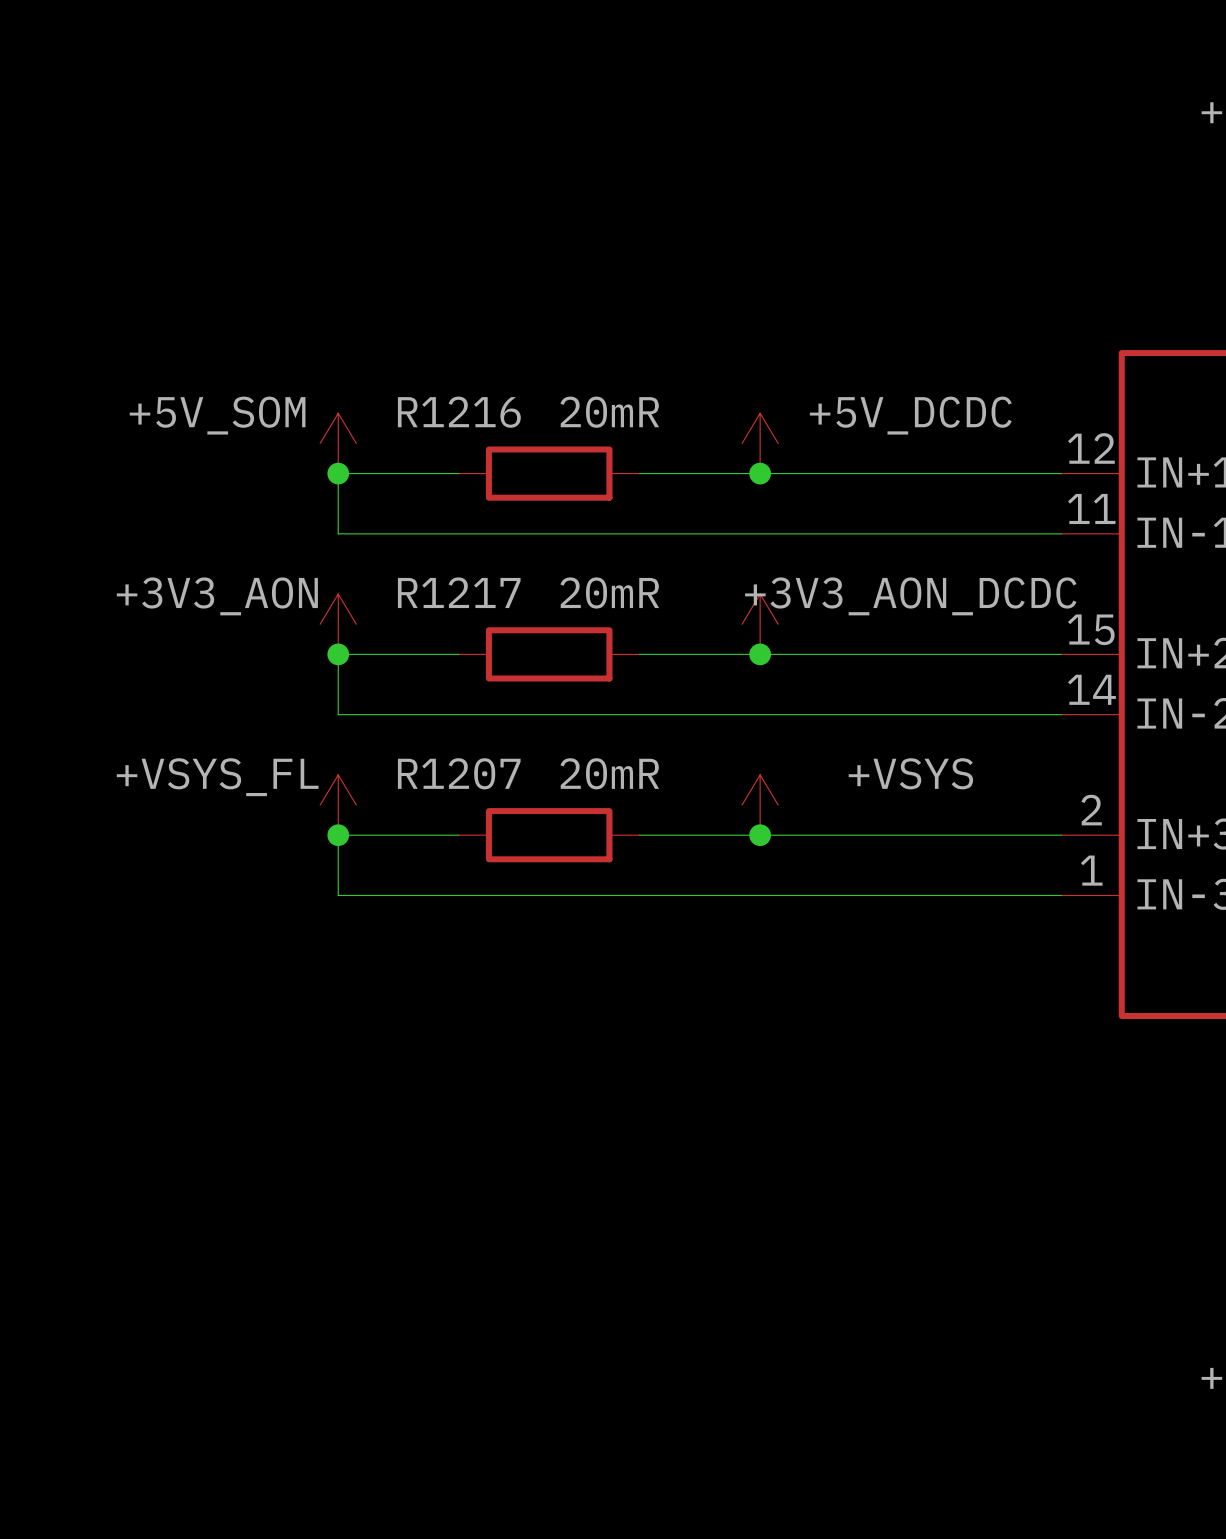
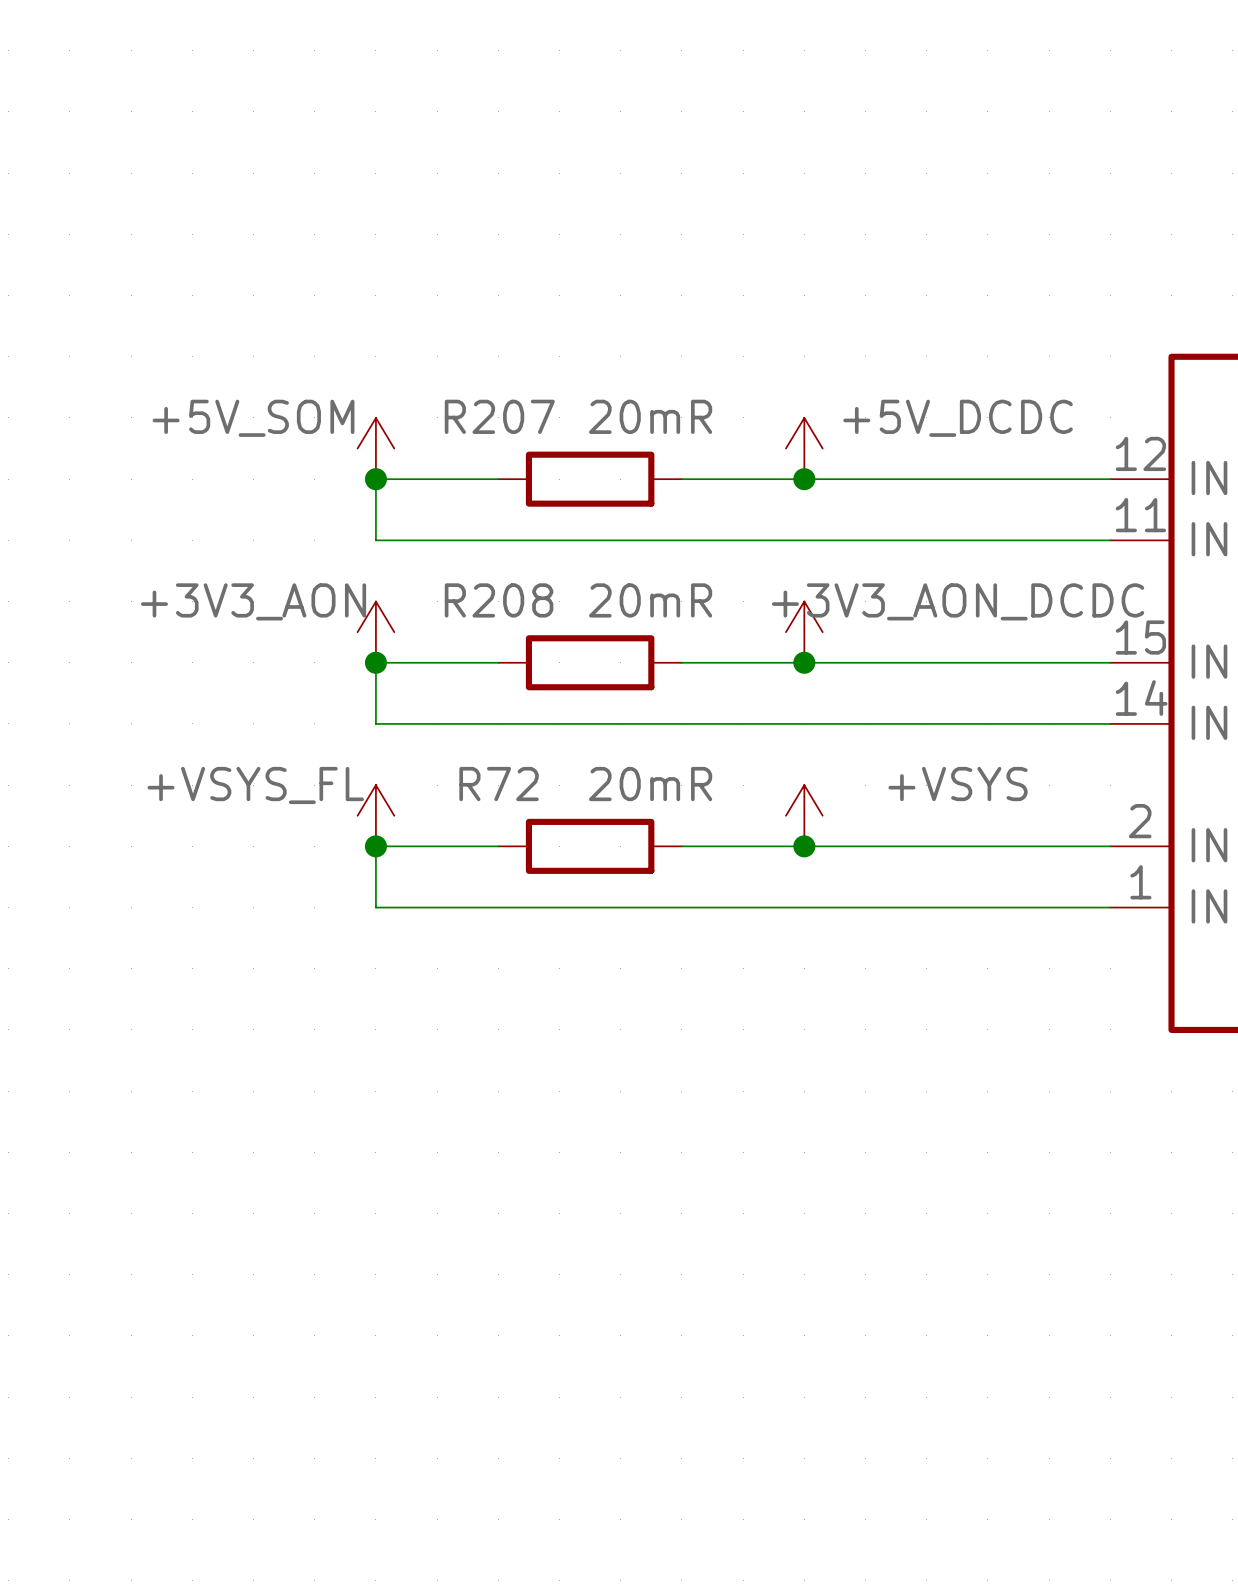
R1216 name: R1216 (459, 412) -> R207 (499, 416)
R1217 name: R1217 (459, 592) -> R208 (499, 600)
R1207 name: R1207 (459, 773) -> R72 (499, 784)

